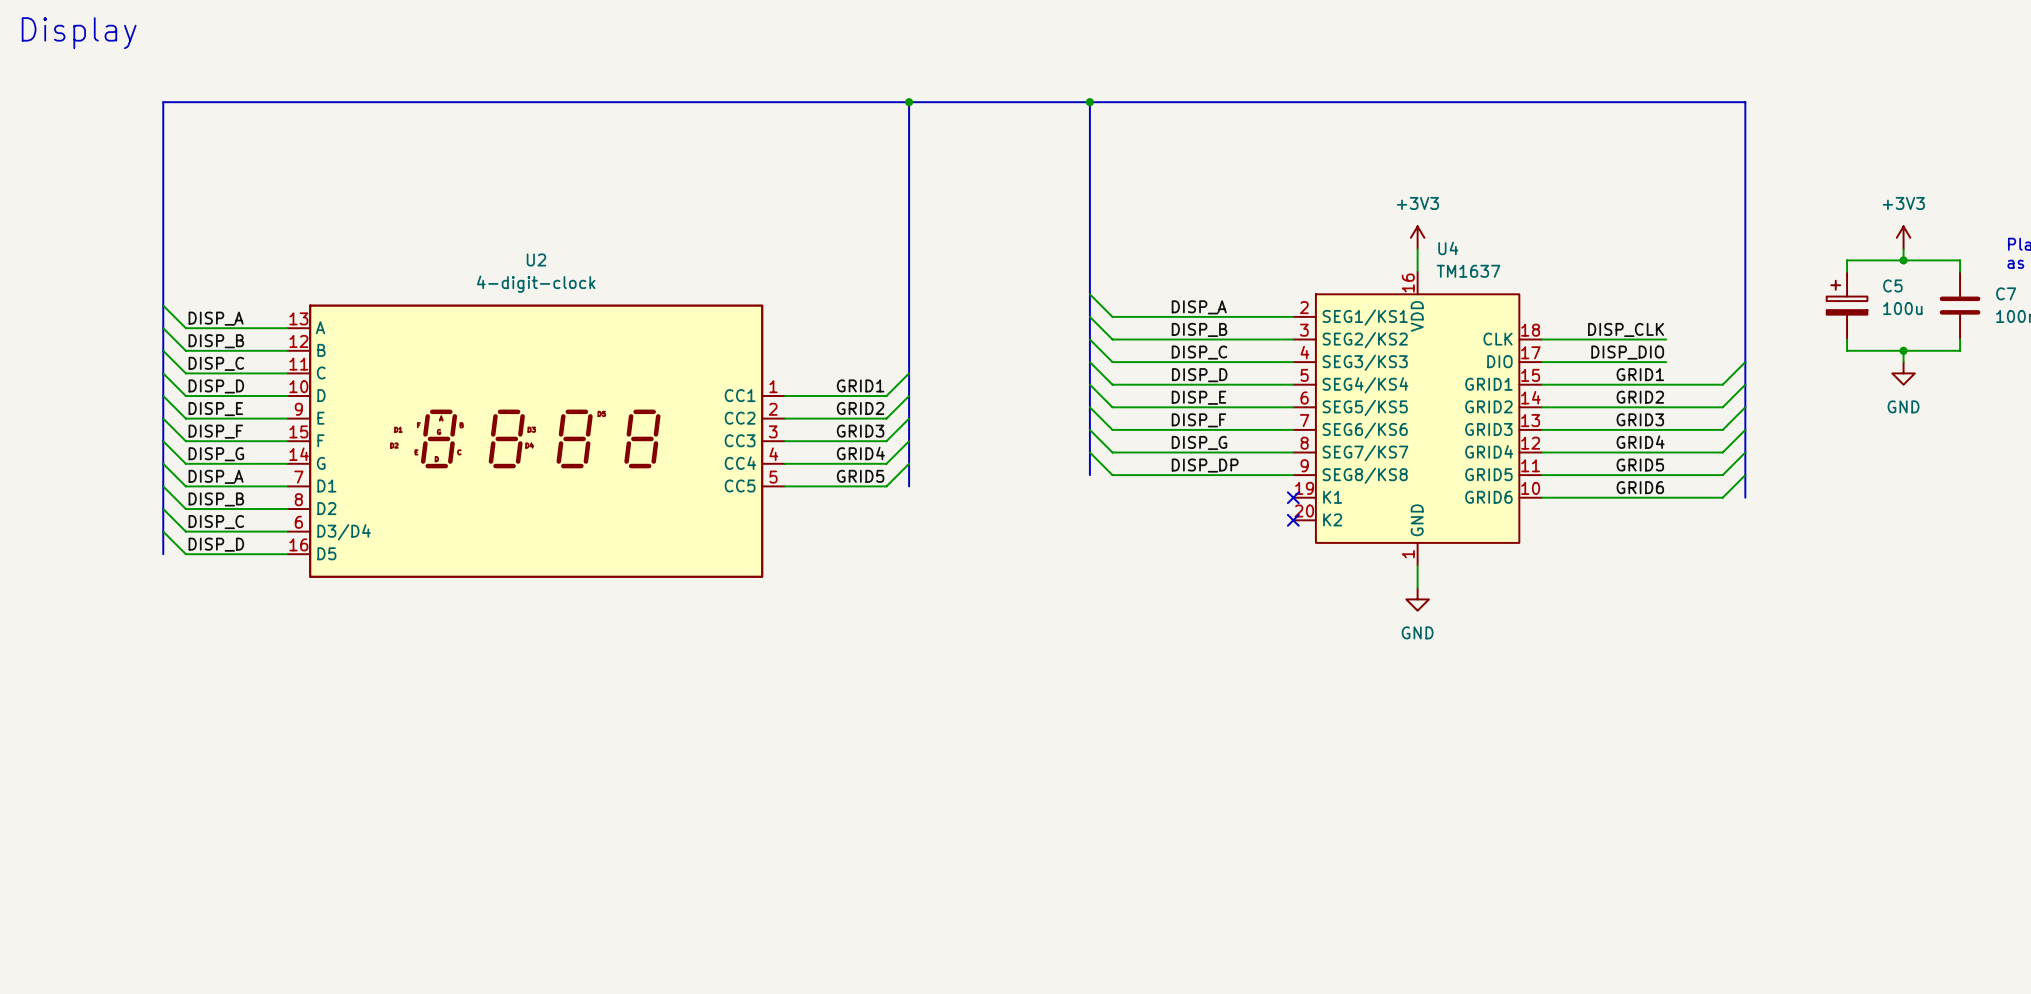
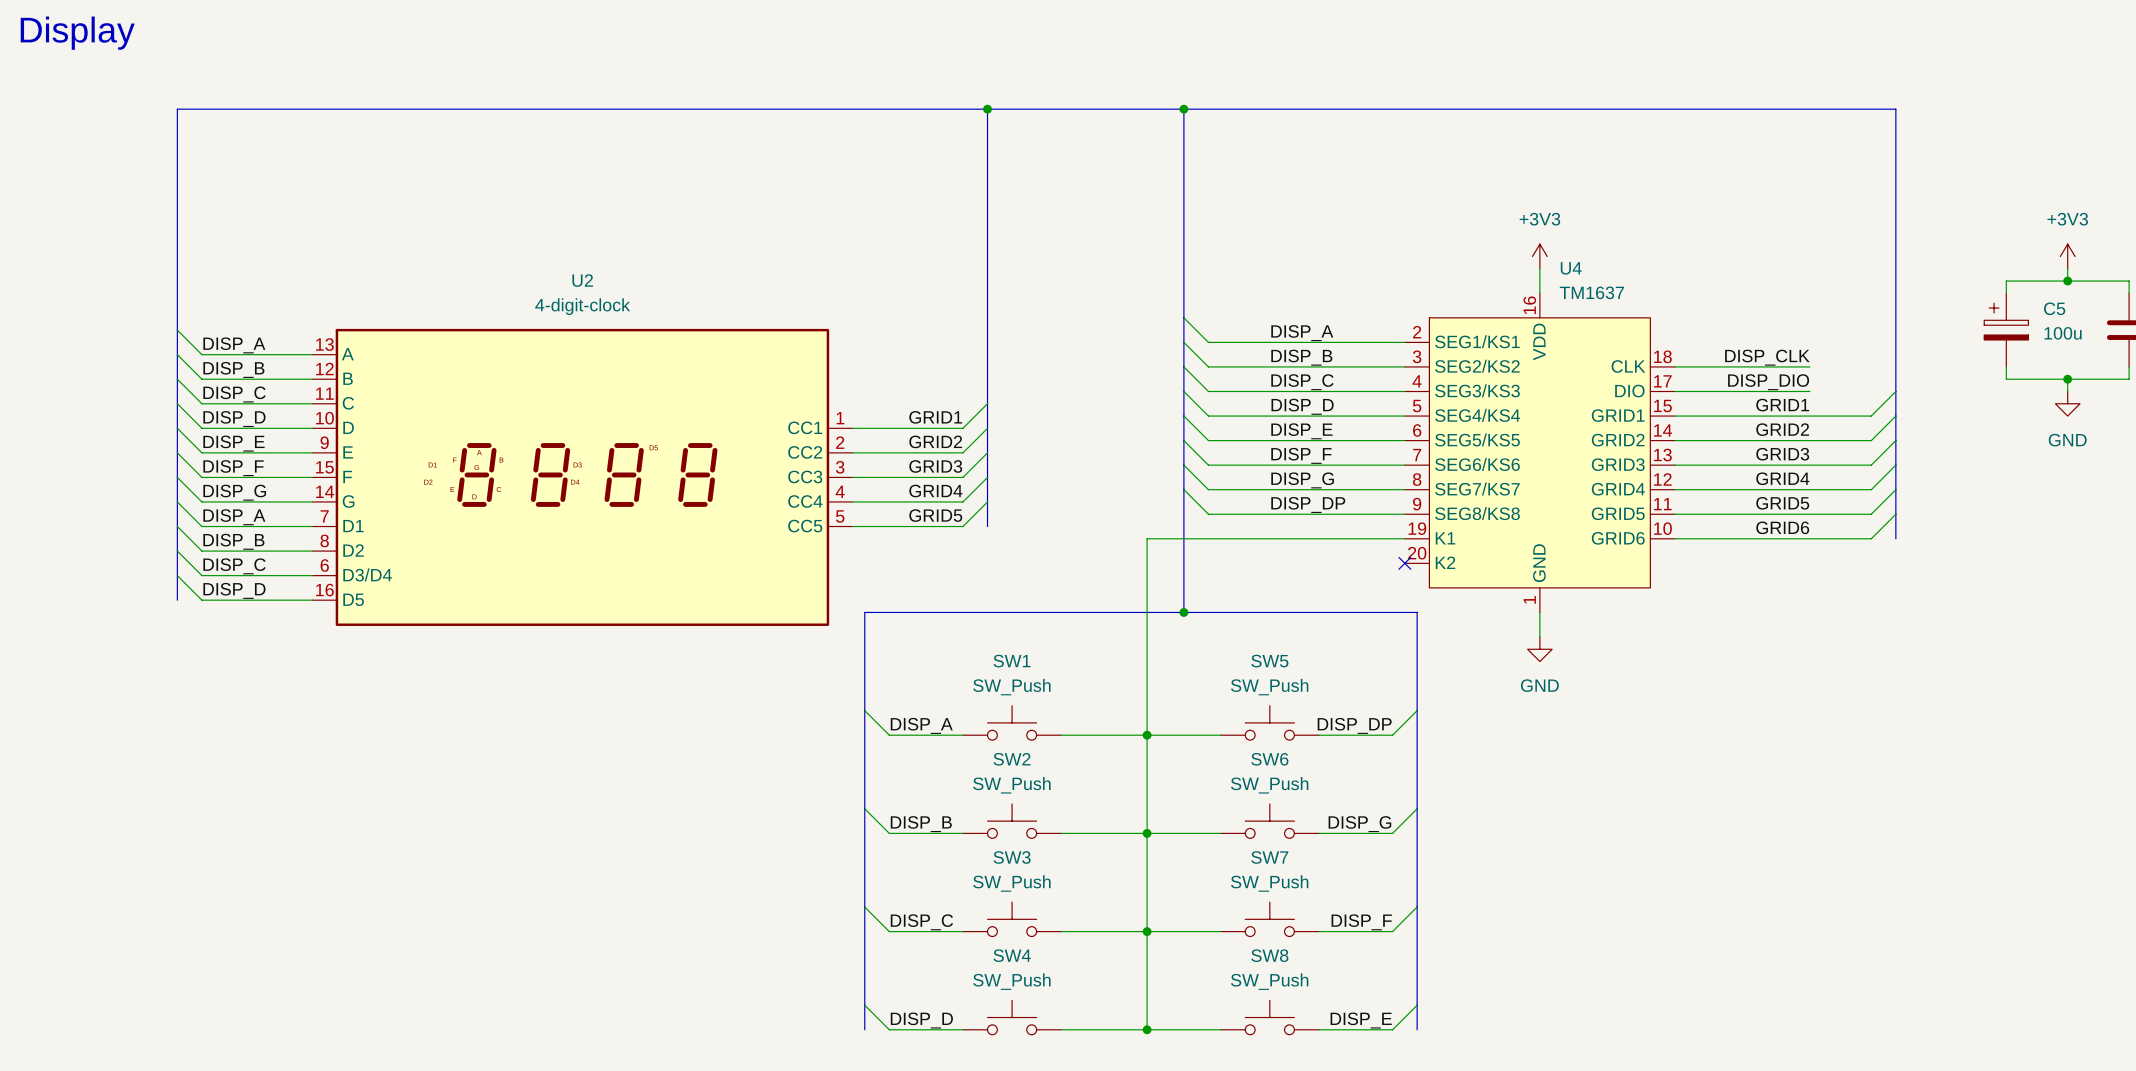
bus: none -> (1183, 514) (1183, 612)
wire: none -> (1404, 538) (1147, 538) (1147, 1029)
no-connect mark: (1293, 497) -> none
junction: none -> (1183, 612)
wire: none -> (864, 710) (889, 735) (962, 735)
wire: none -> (1417, 710) (1392, 735) (1318, 735)
SW1: none -> SW_Push (1012, 722)
SW5: none -> SW_Push (1269, 722)
label: none -> DISP_A (921, 725)
label: none -> DISP_DP (1354, 725)
wire: none -> (1061, 735) (1220, 735)
junction: none -> (1147, 735)
wire: none -> (864, 808) (889, 833) (962, 833)
wire: none -> (1417, 808) (1392, 833) (1318, 833)
SW2: none -> SW_Push (1012, 821)
SW6: none -> SW_Push (1269, 821)
label: none -> DISP_B (921, 824)
label: none -> DISP_G (1359, 824)
wire: none -> (1061, 833) (1220, 833)
junction: none -> (1147, 833)
wire: none -> (864, 907) (889, 931) (962, 931)
wire: none -> (1417, 907) (1392, 931) (1318, 931)
SW3: none -> SW_Push (1012, 919)
SW7: none -> SW_Push (1269, 919)
label: none -> DISP_C (921, 922)
label: none -> DISP_F (1361, 922)
wire: none -> (1061, 931) (1220, 931)
junction: none -> (1147, 931)
wire: none -> (864, 1005) (889, 1029) (962, 1029)
wire: none -> (1417, 1005) (1392, 1029) (1318, 1029)
SW4: none -> SW_Push (1012, 1017)
SW8: none -> SW_Push (1269, 1017)
label: none -> DISP_D (921, 1020)
label: none -> DISP_E (1361, 1020)
bus: none -> (864, 1029) (864, 612) (1417, 612) (1417, 1029)
wire: none -> (1061, 1029) (1220, 1029)
junction: none -> (1147, 1029)

